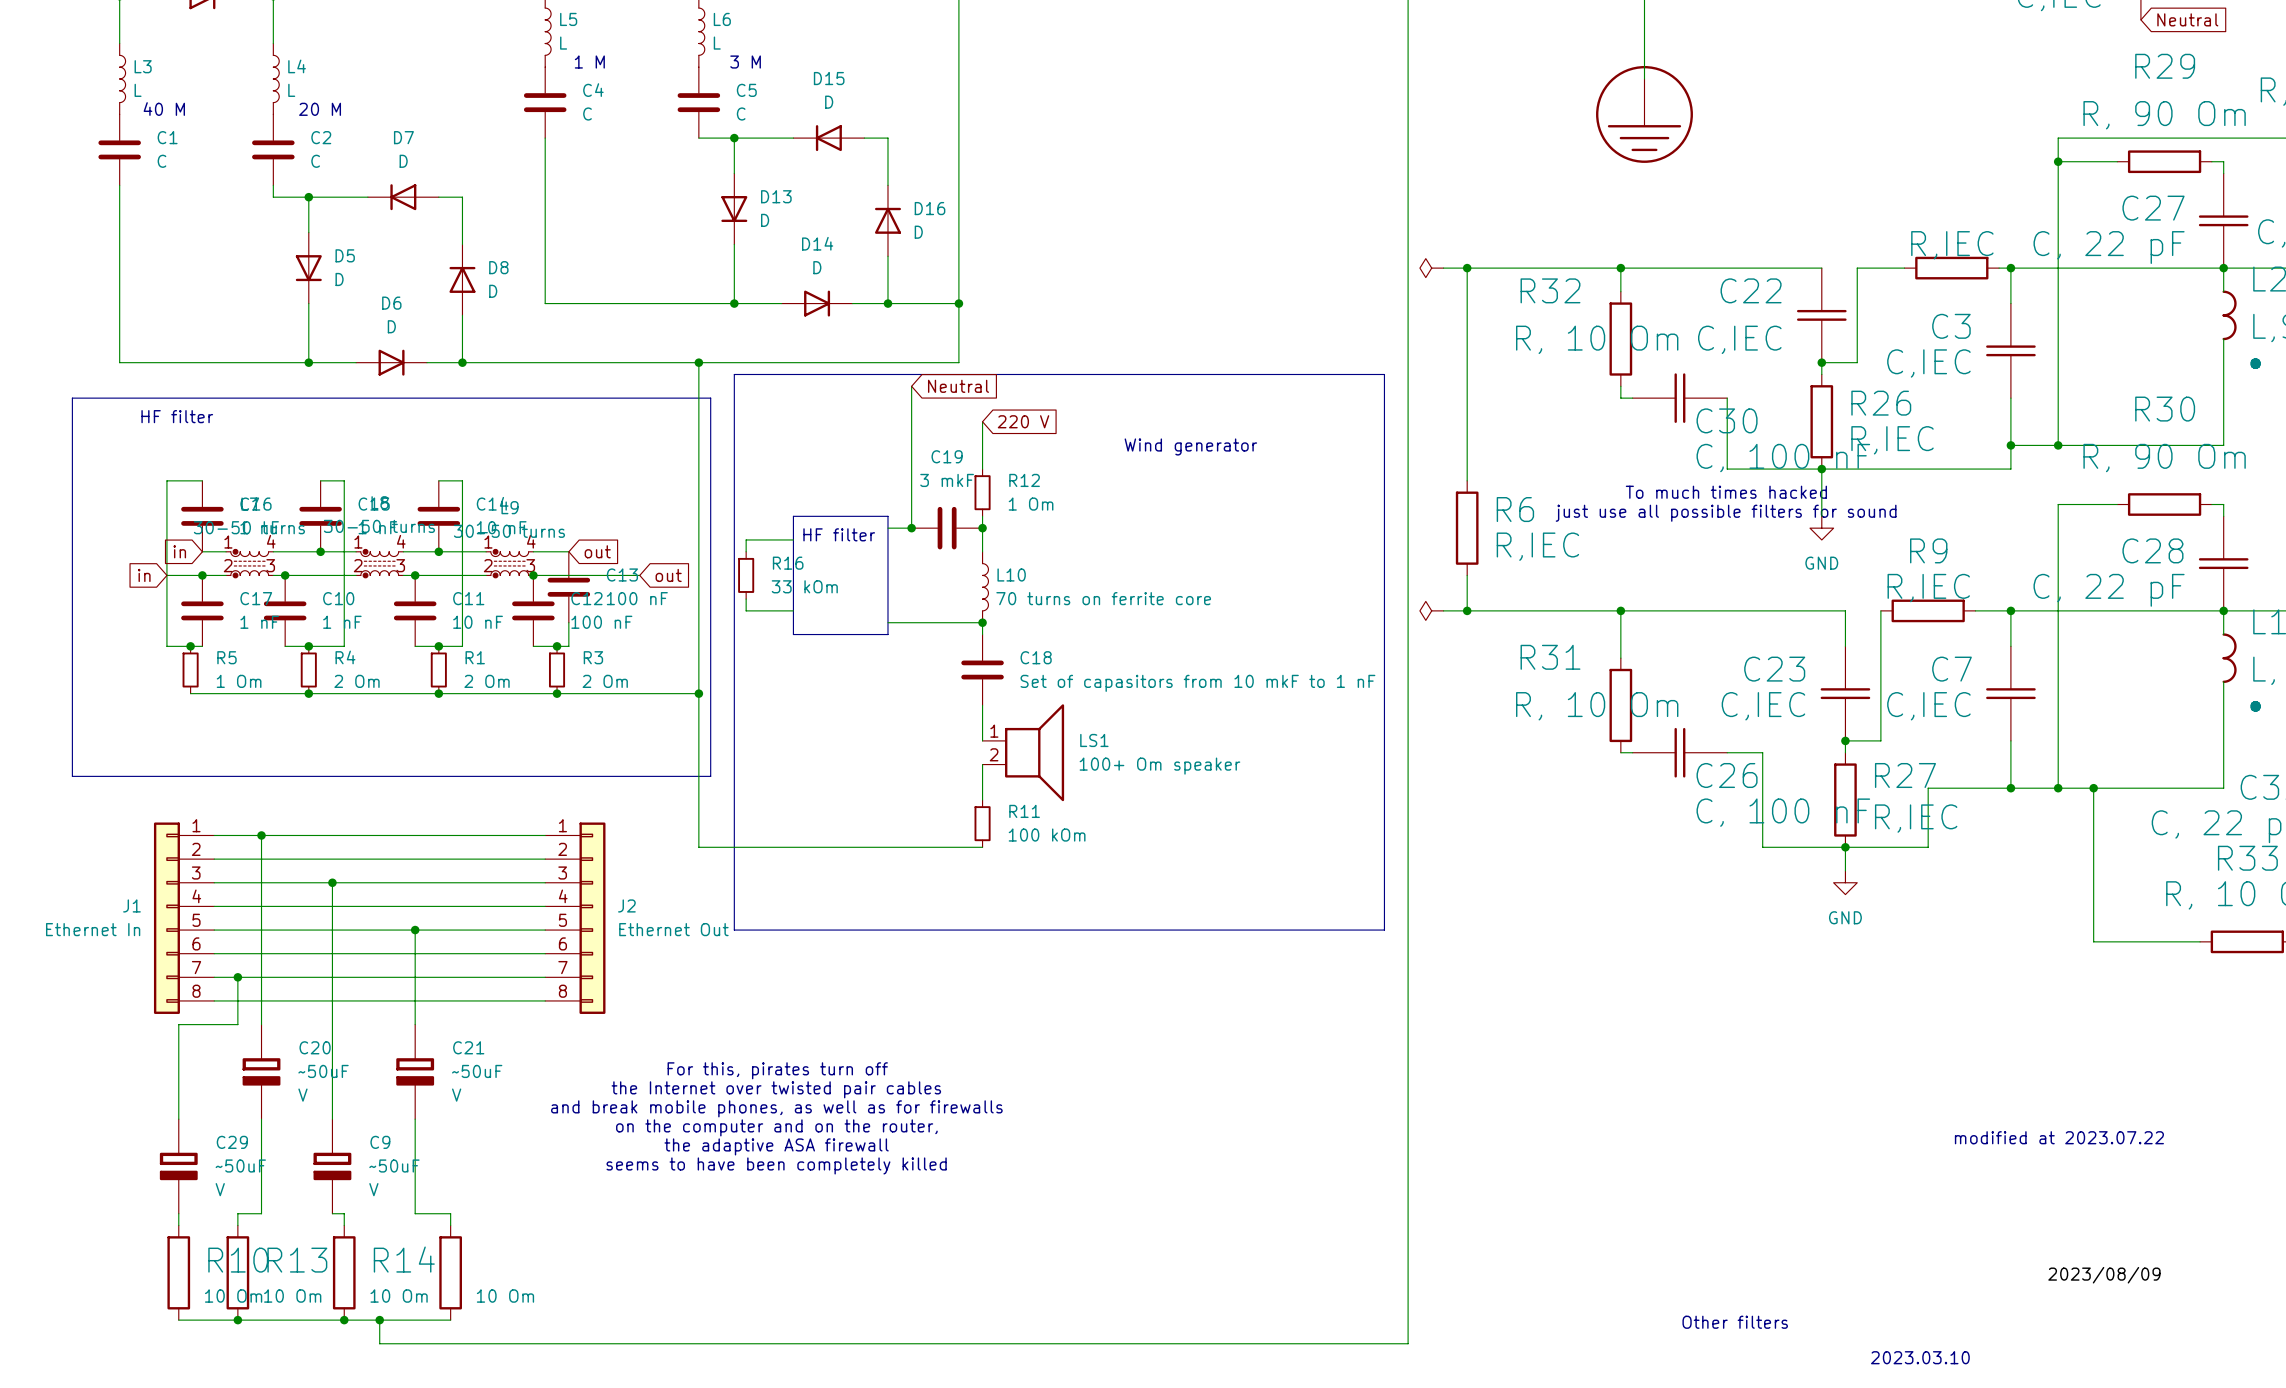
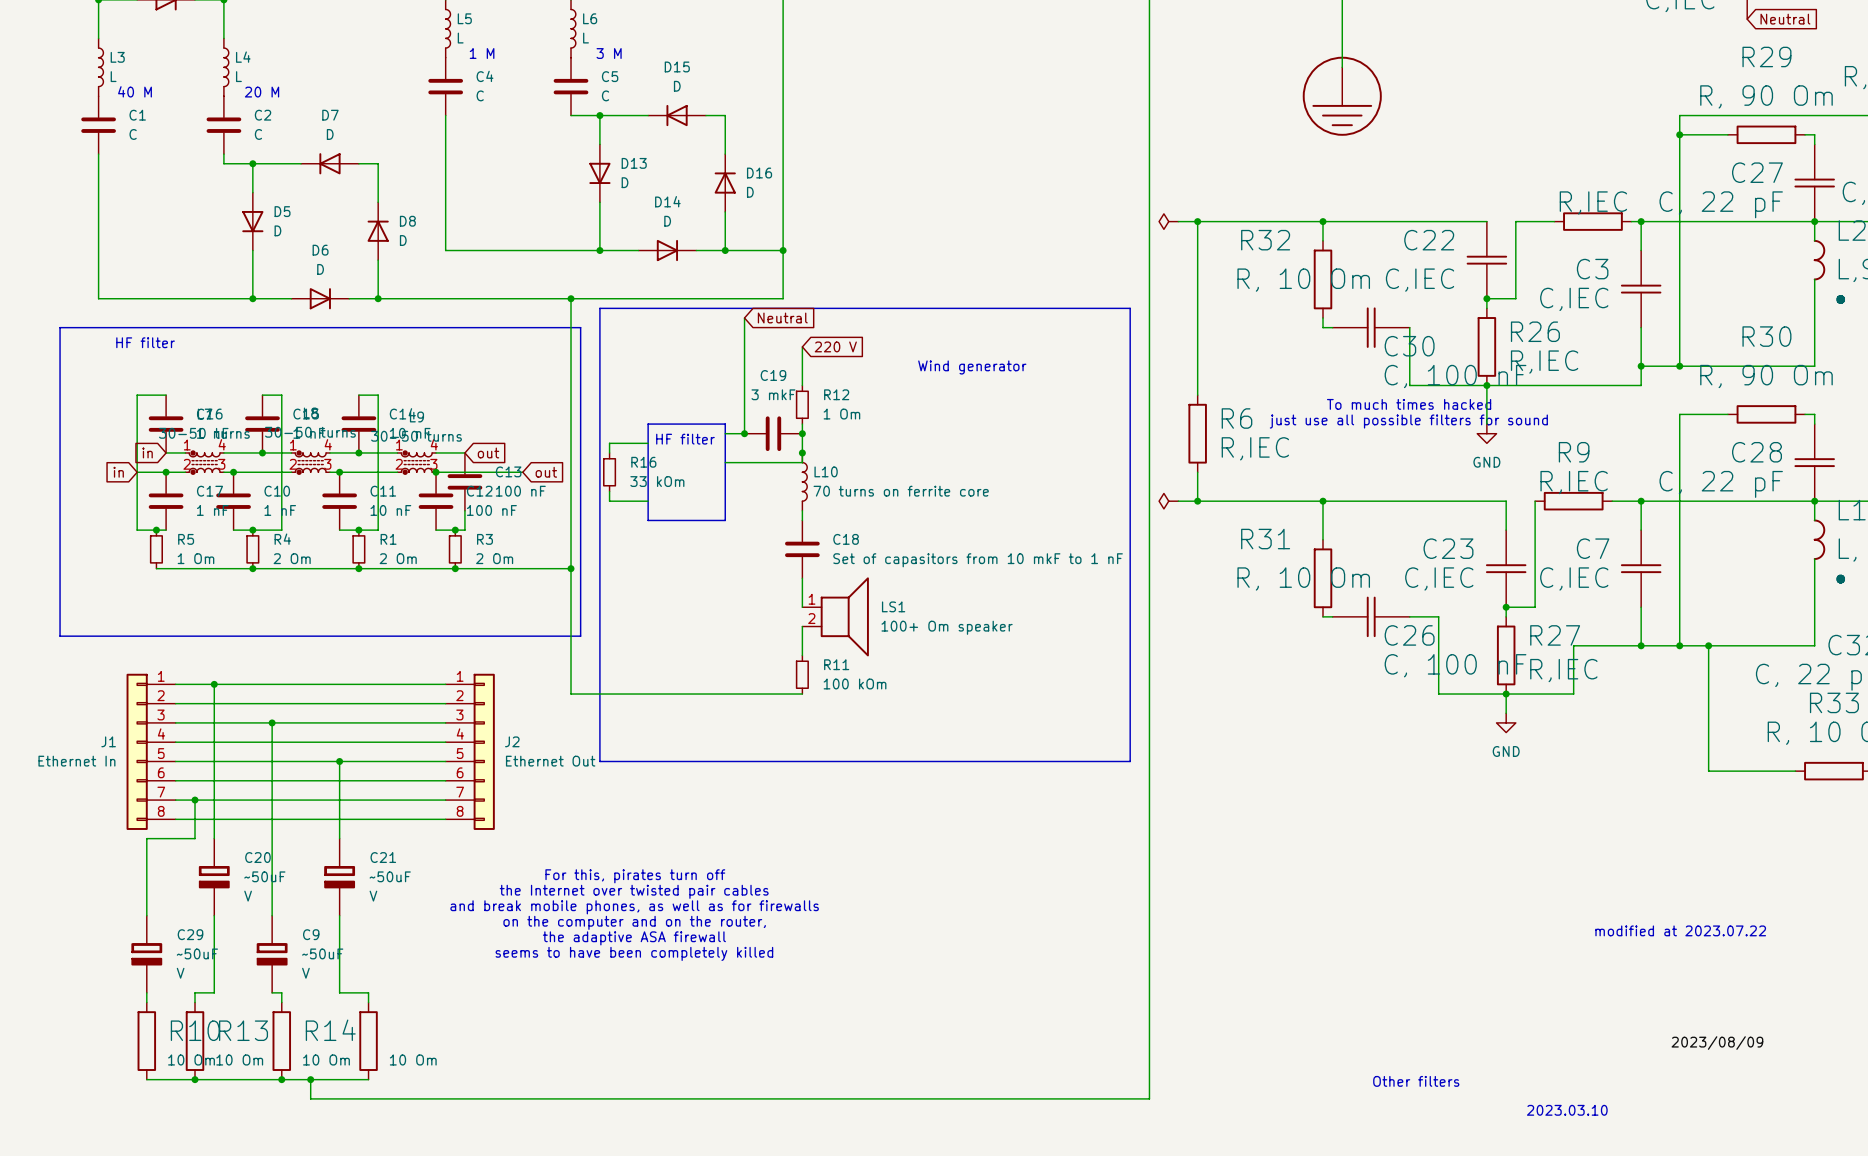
wire: none -> (802, 452) (802, 462) (725, 462)
junction: none -> (802, 452)
wire: (887, 622) (982, 622) -> none
junction: (982, 622) -> none

